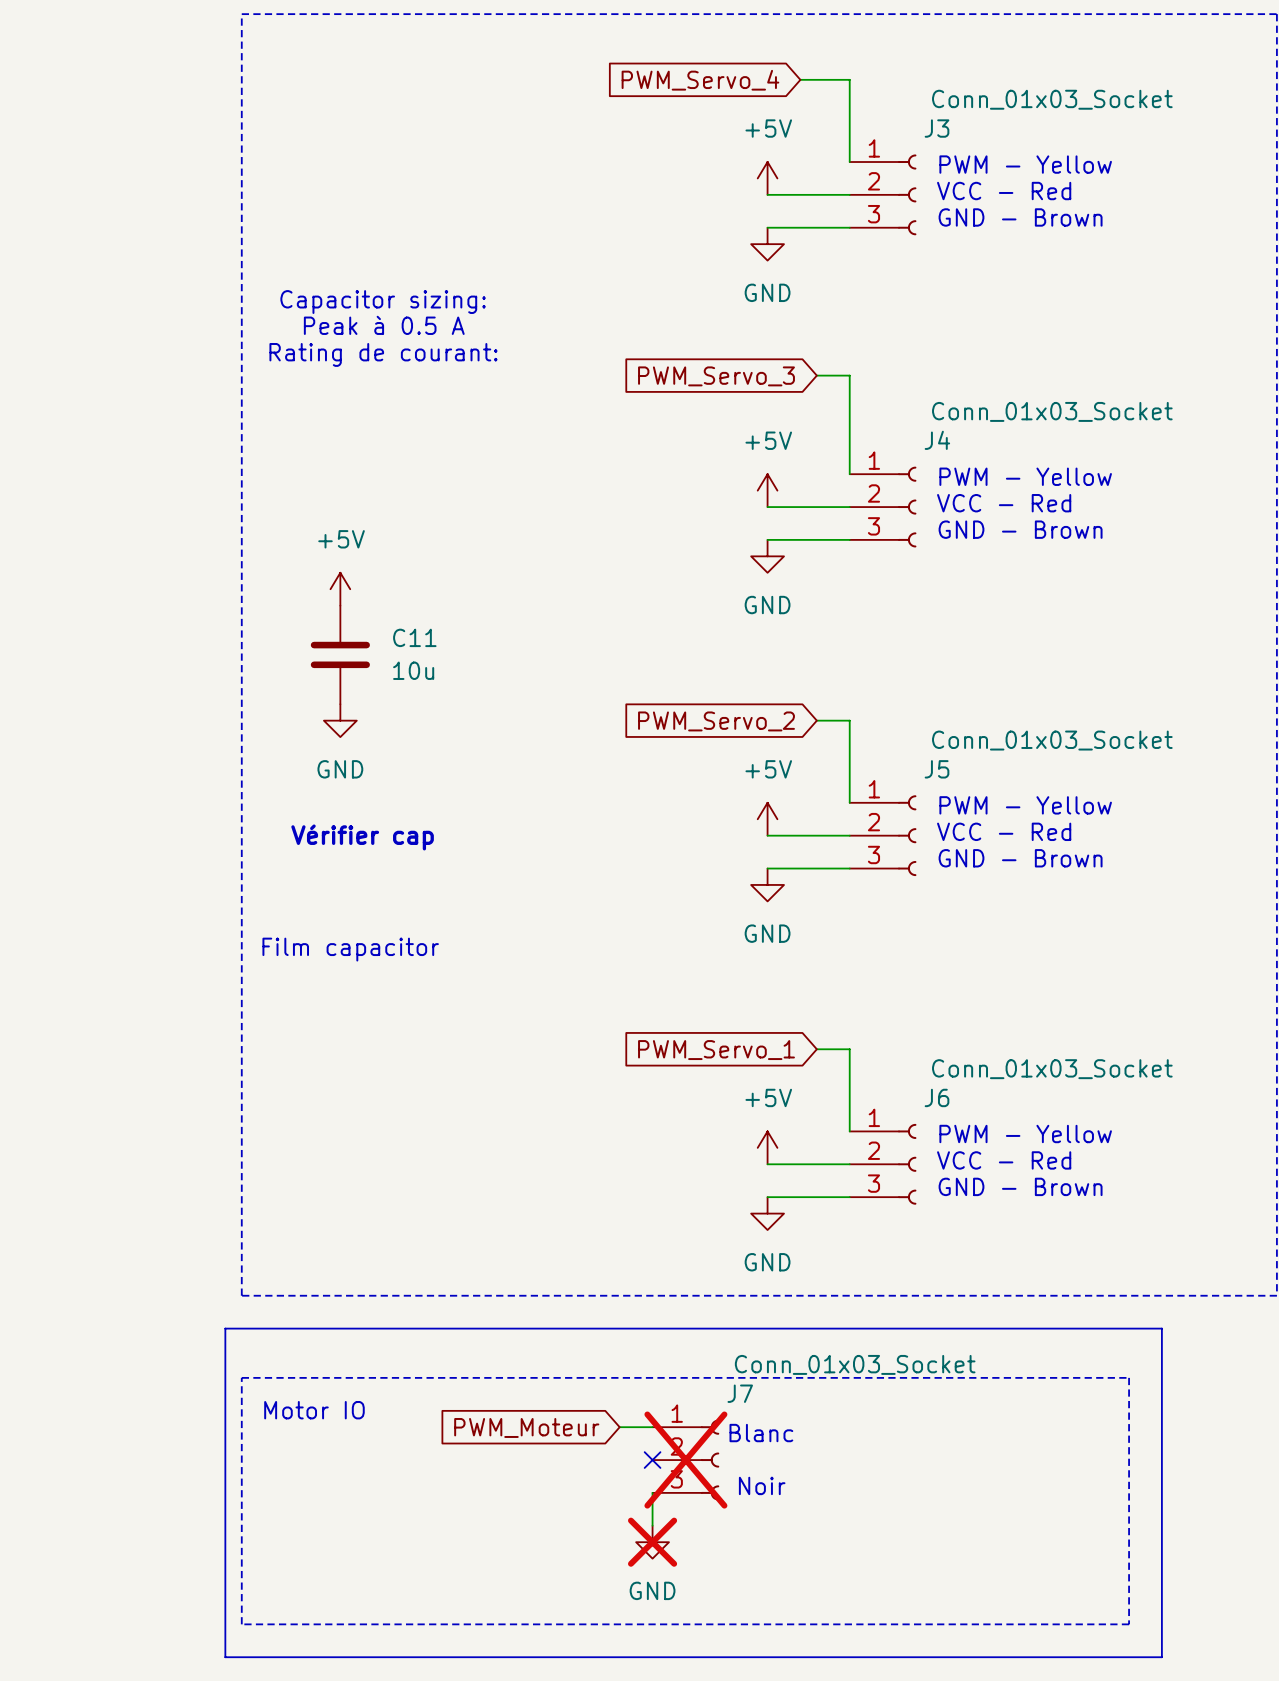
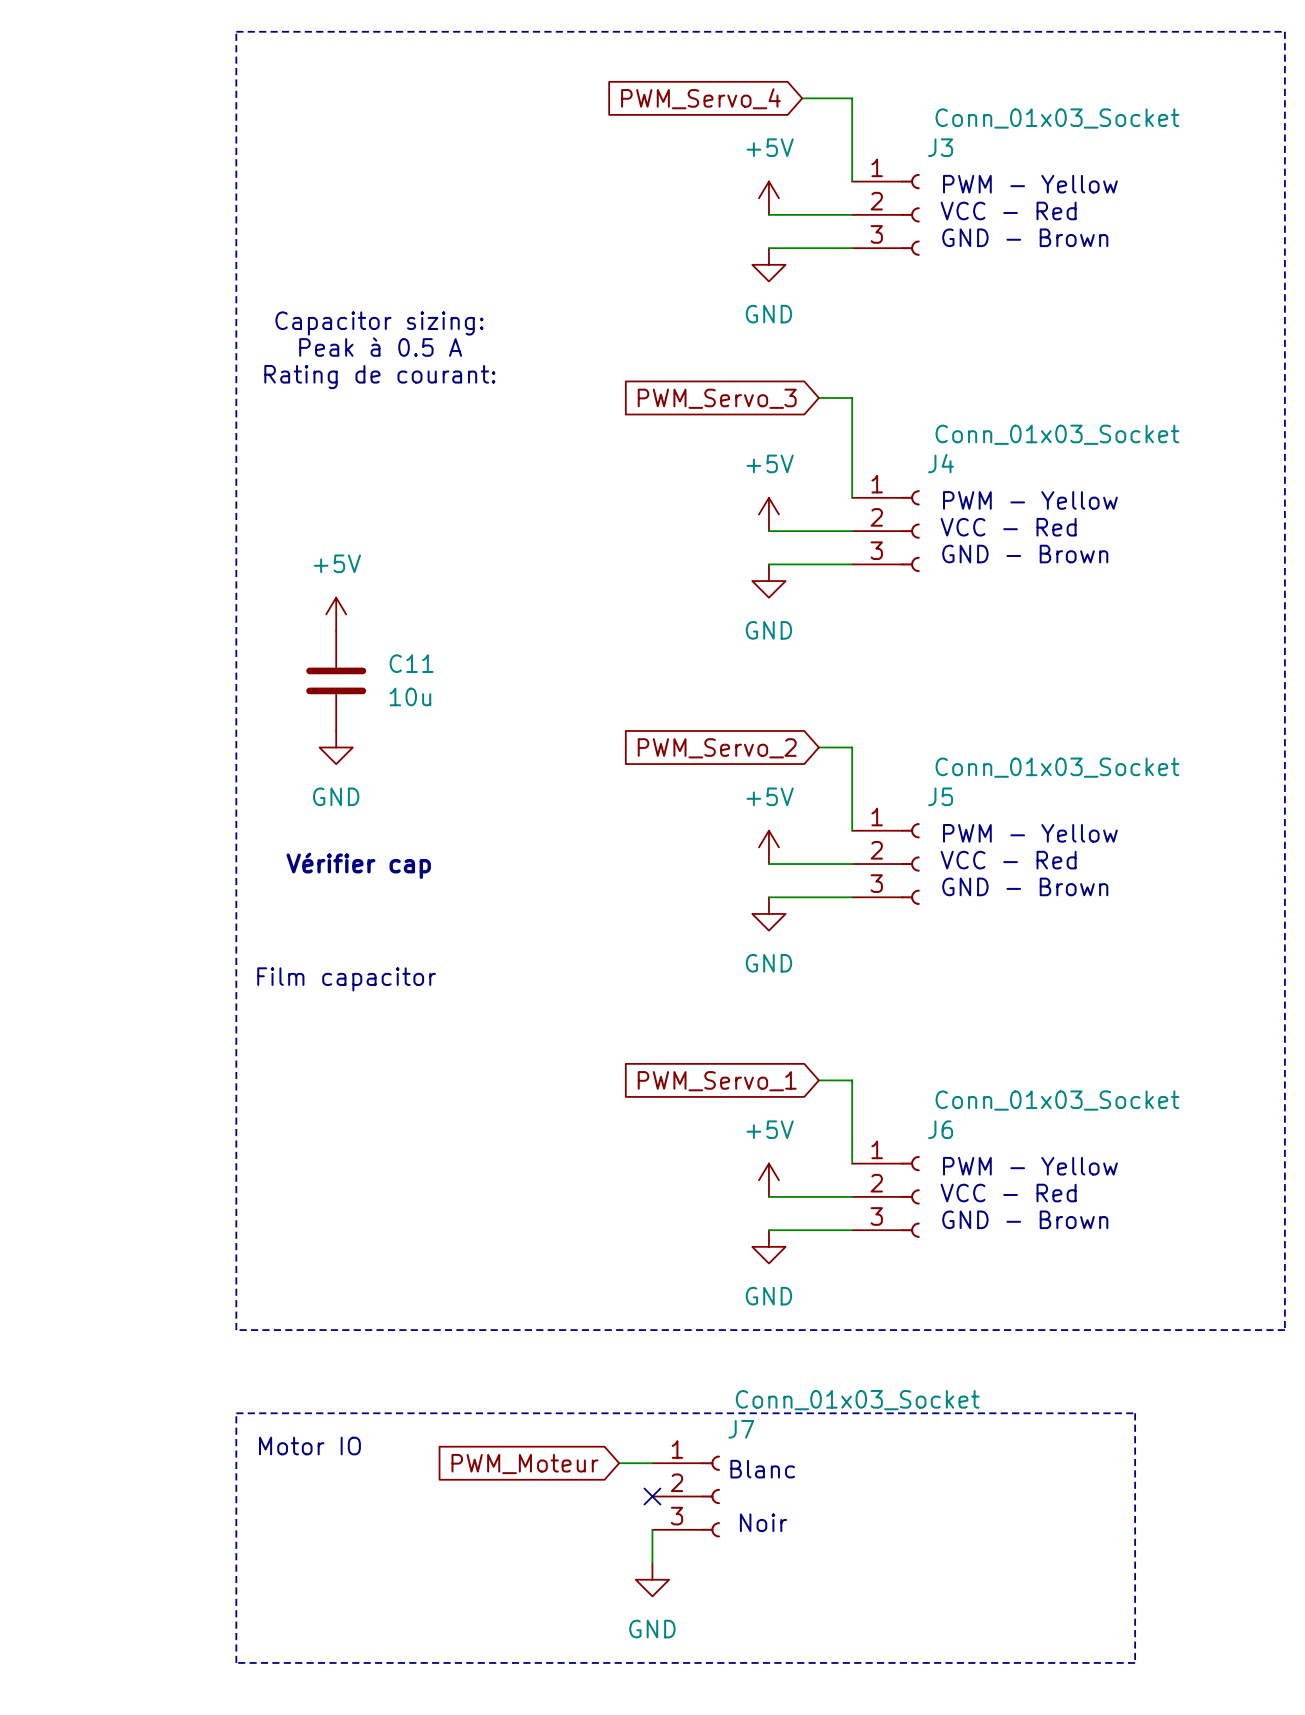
line: (225, 1328) (1161, 1328) (1161, 1657) (225, 1657) (225, 1328) -> none
J7 do-not-place cross: (685, 1460) -> none
power symbol do-not-place cross: (652, 1542) -> none

